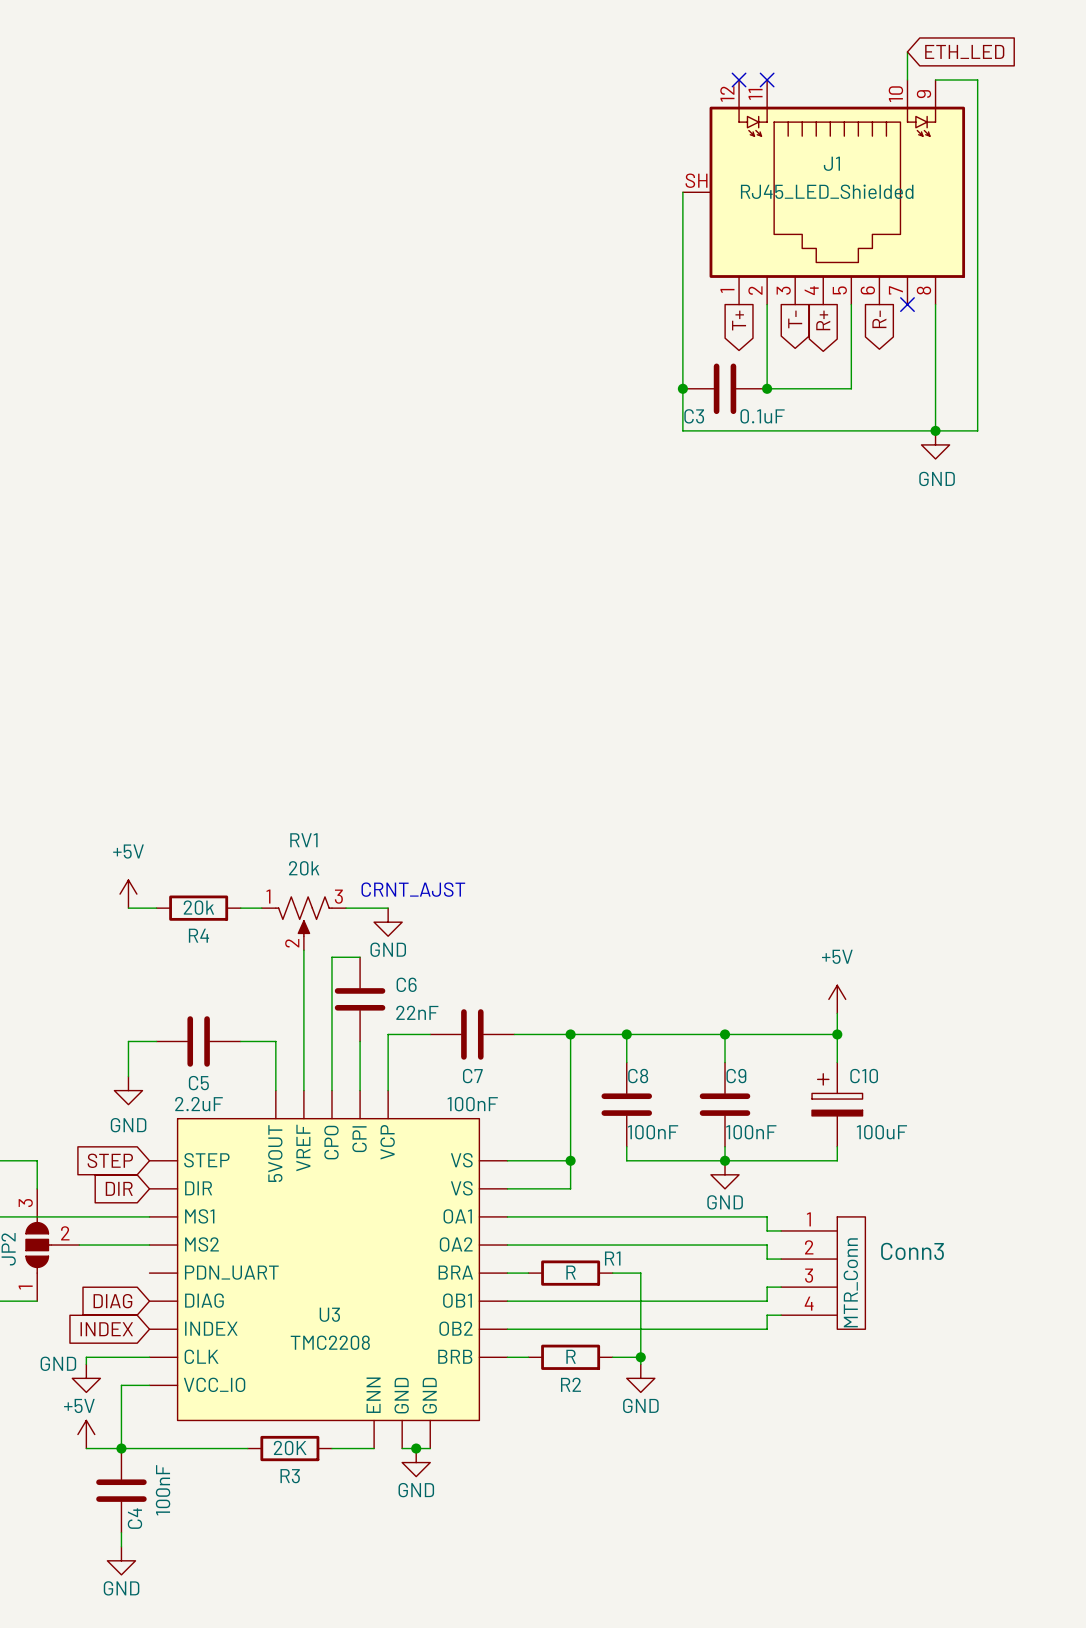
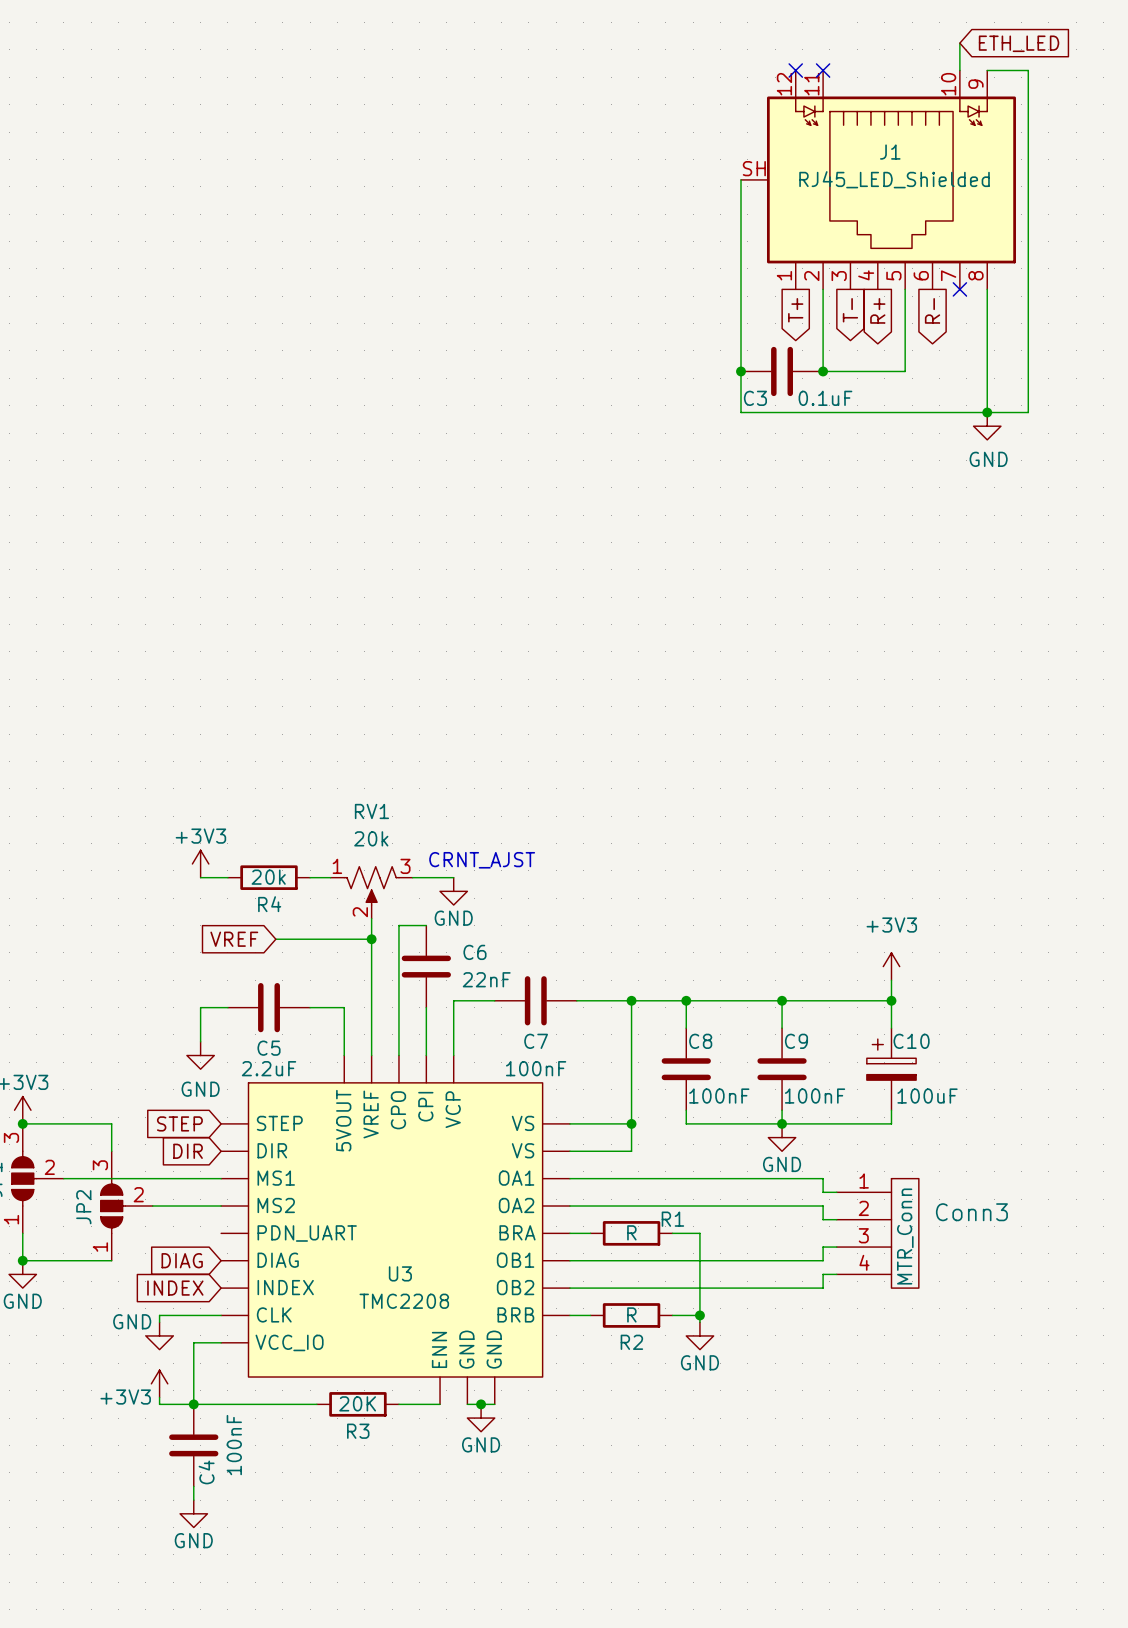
power symbol: +5V (128, 894) -> +3V3 (200, 863)
global label: none -> VREF (234, 939)
wire: none -> (275, 939) (371, 939)
junction: none -> (371, 939)
power symbol: +5V (837, 999) -> +3V3 (891, 966)
power symbol: +5V (86, 1434) -> +3V3 (159, 1383)

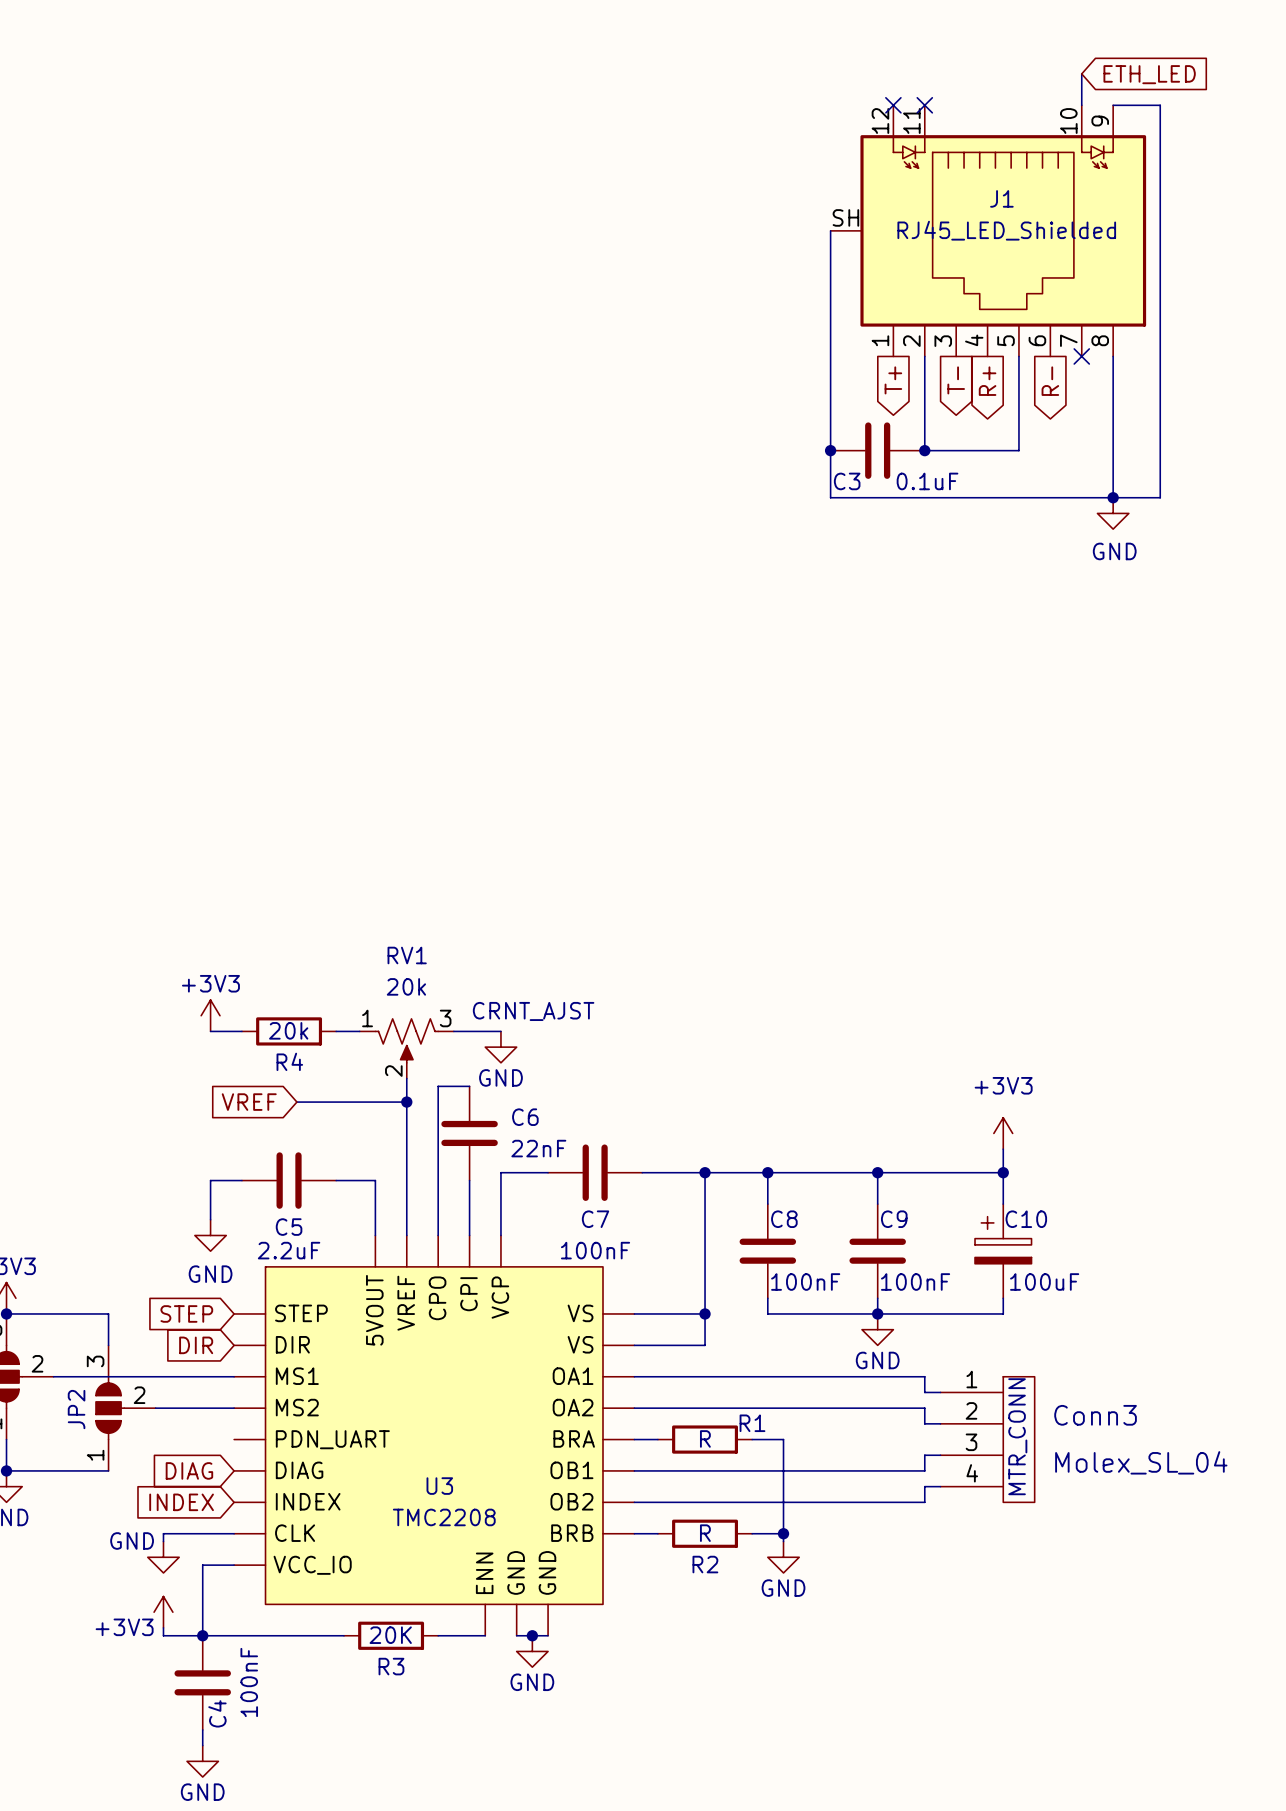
text: none -> MTR_CONN (1017, 1436)
Conn3 value: MTR_Conn (905, 1236) -> Molex_SL_04 (1141, 1462)

